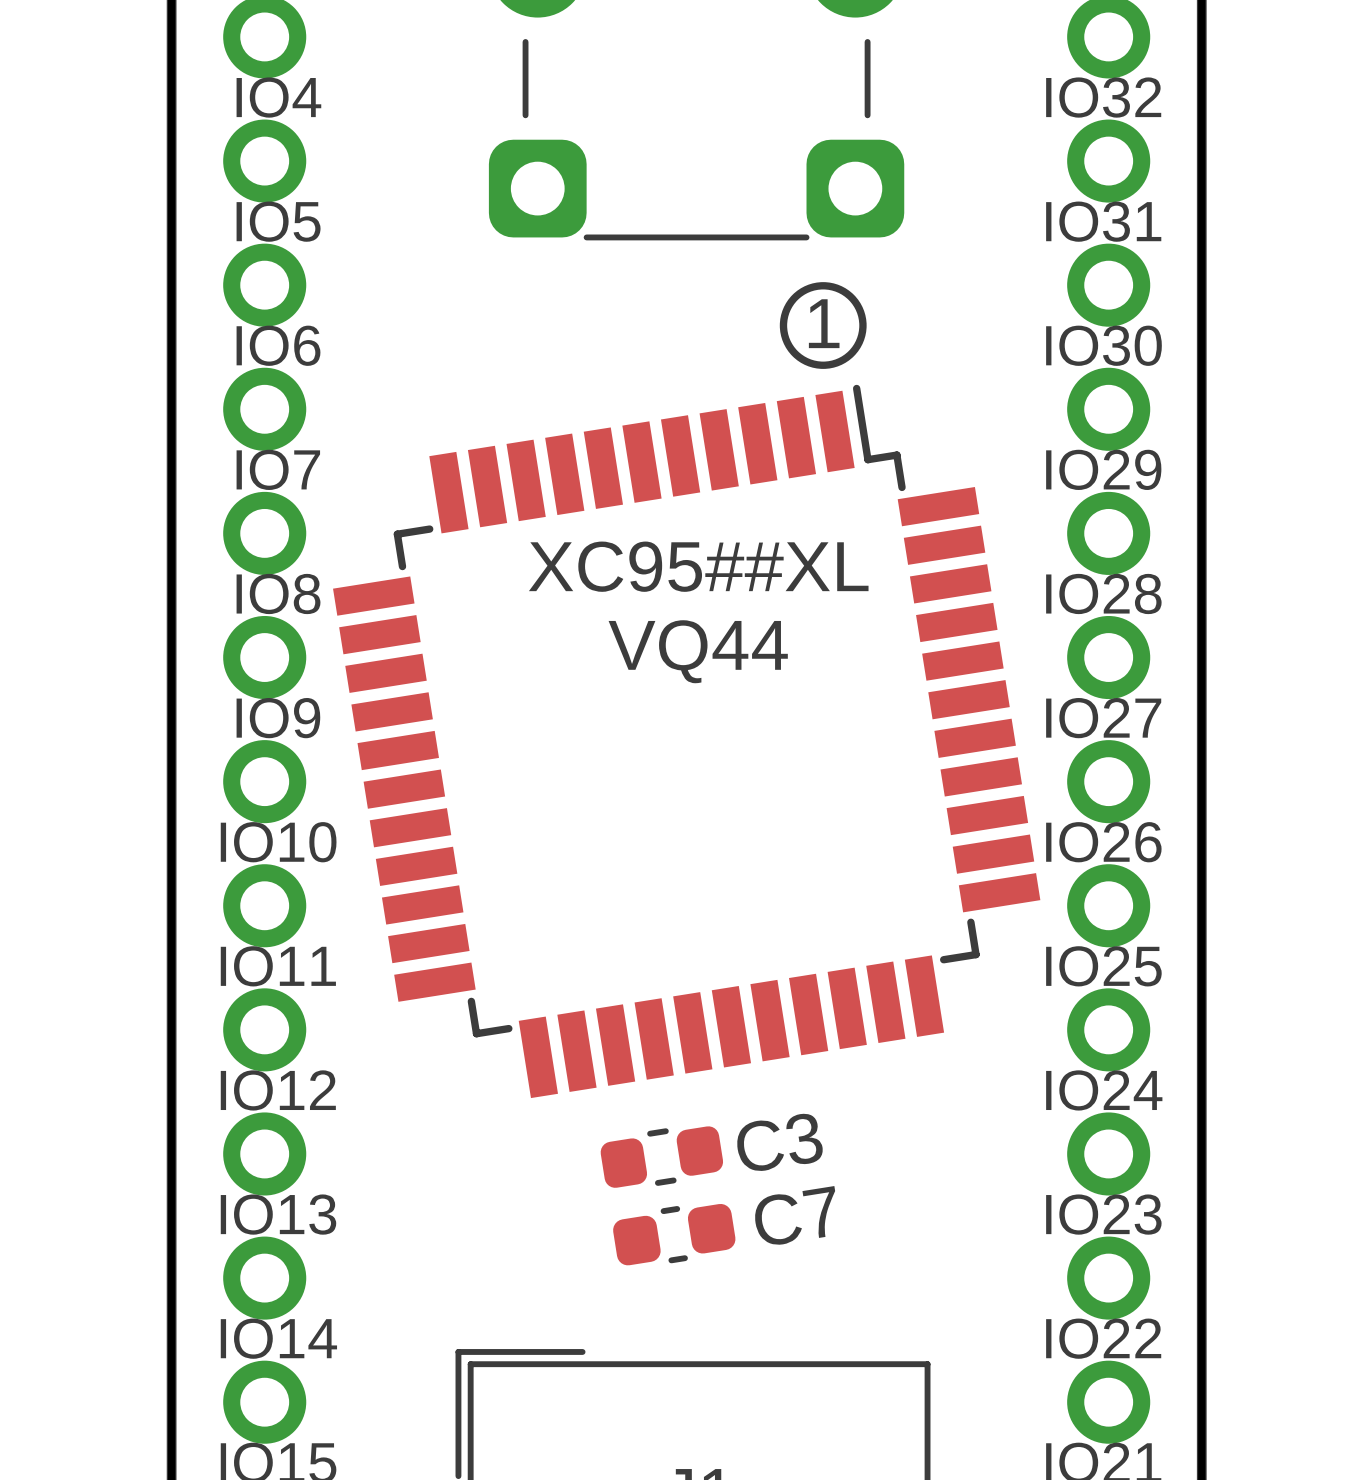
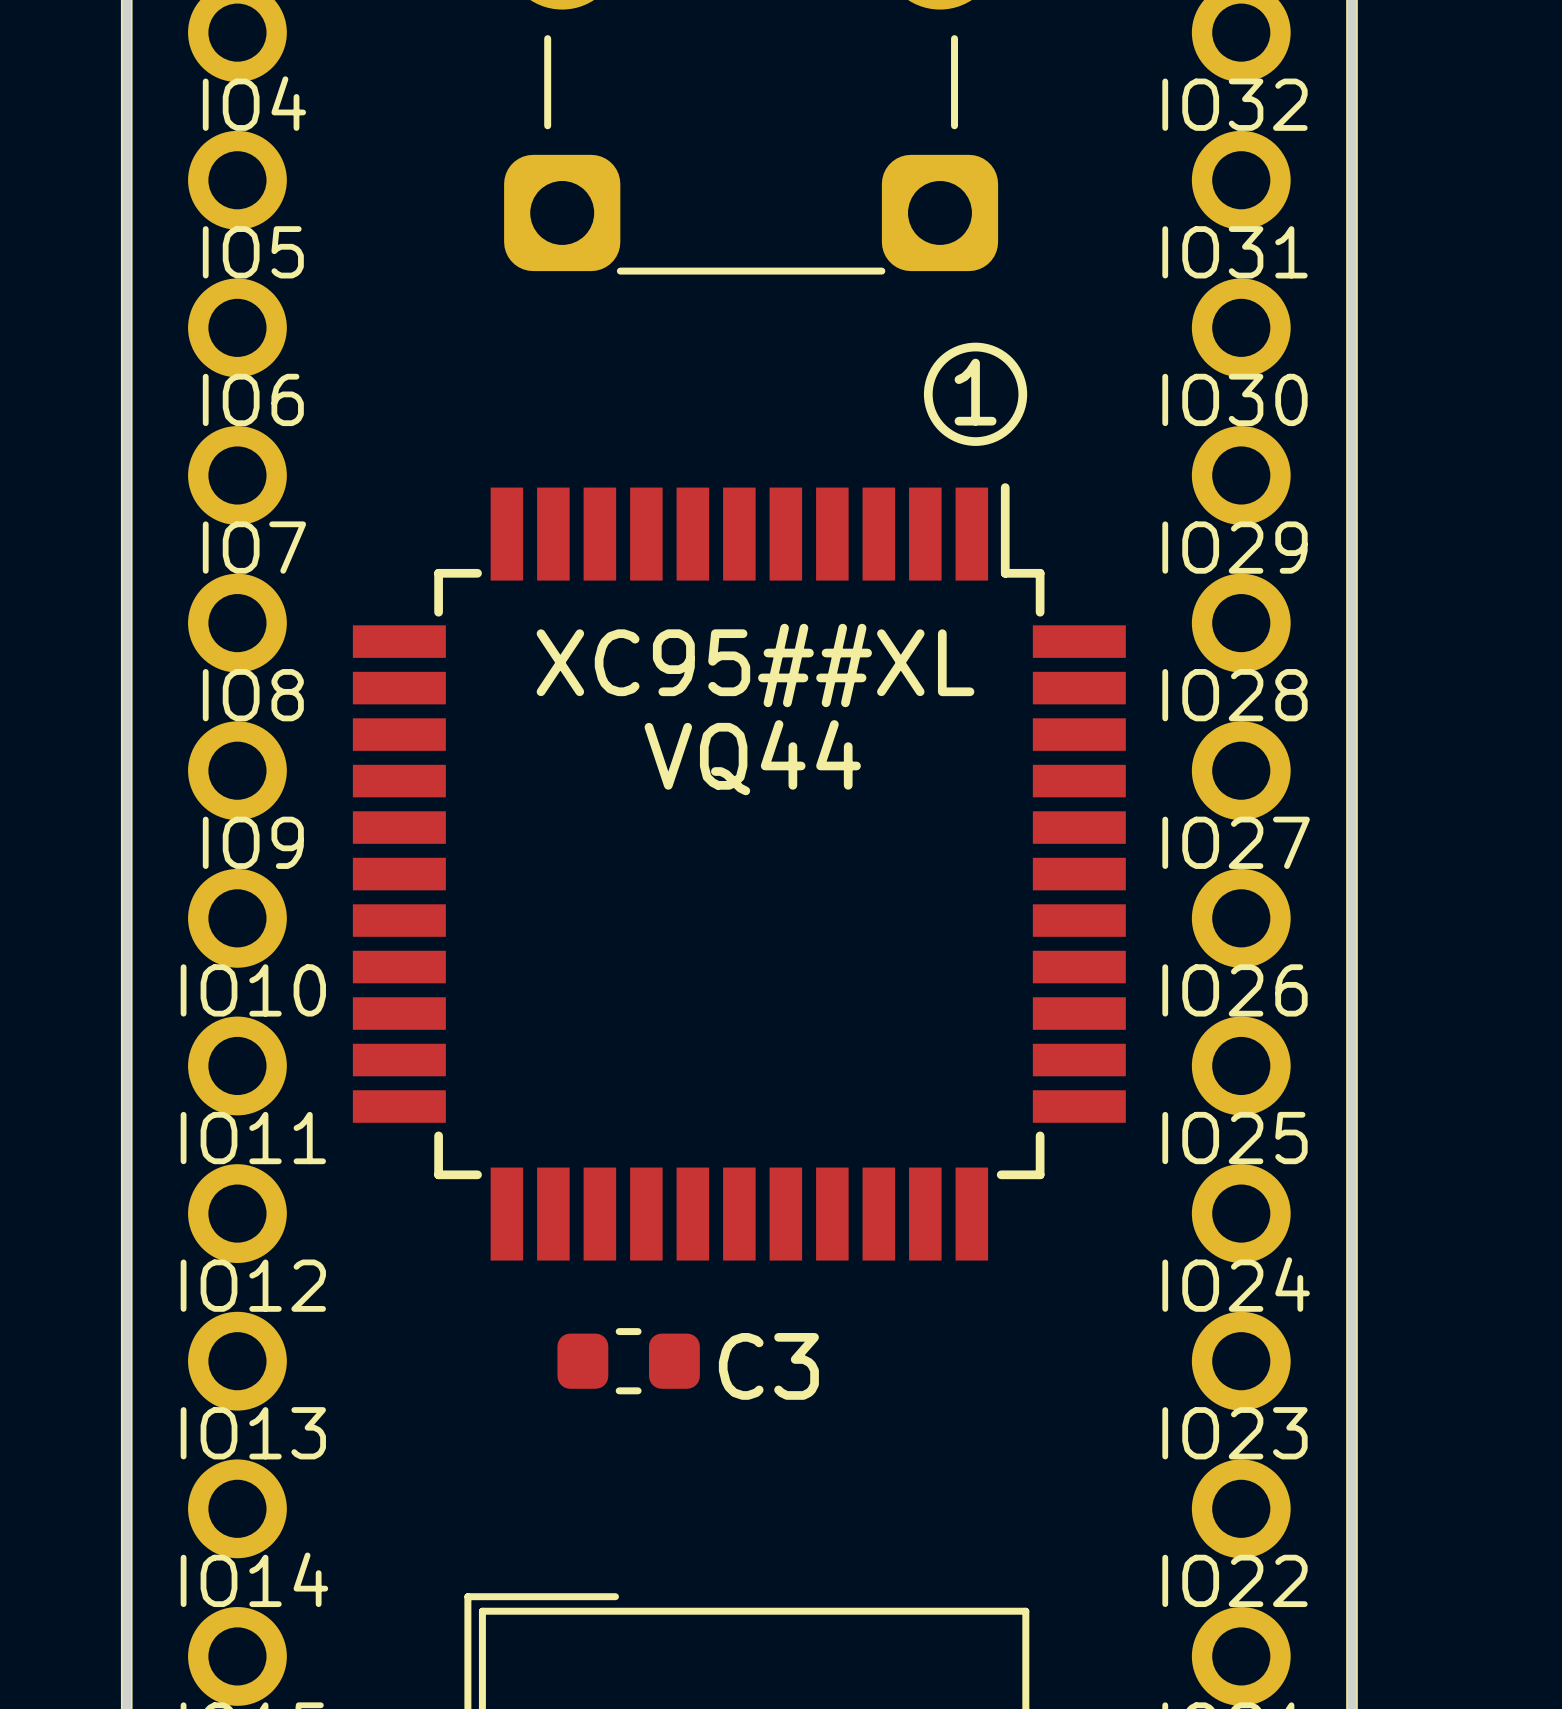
text position: 1 (824, 323) -> 1 (975, 392)
drawing position: (823, 325) -> (975, 394)
part rotation: 0° (686, 741) -> 9° clockwise (739, 871)
C3 rotation: 0° (661, 1157) -> 9° clockwise (628, 1361)
C7: (674, 1234) -> none

